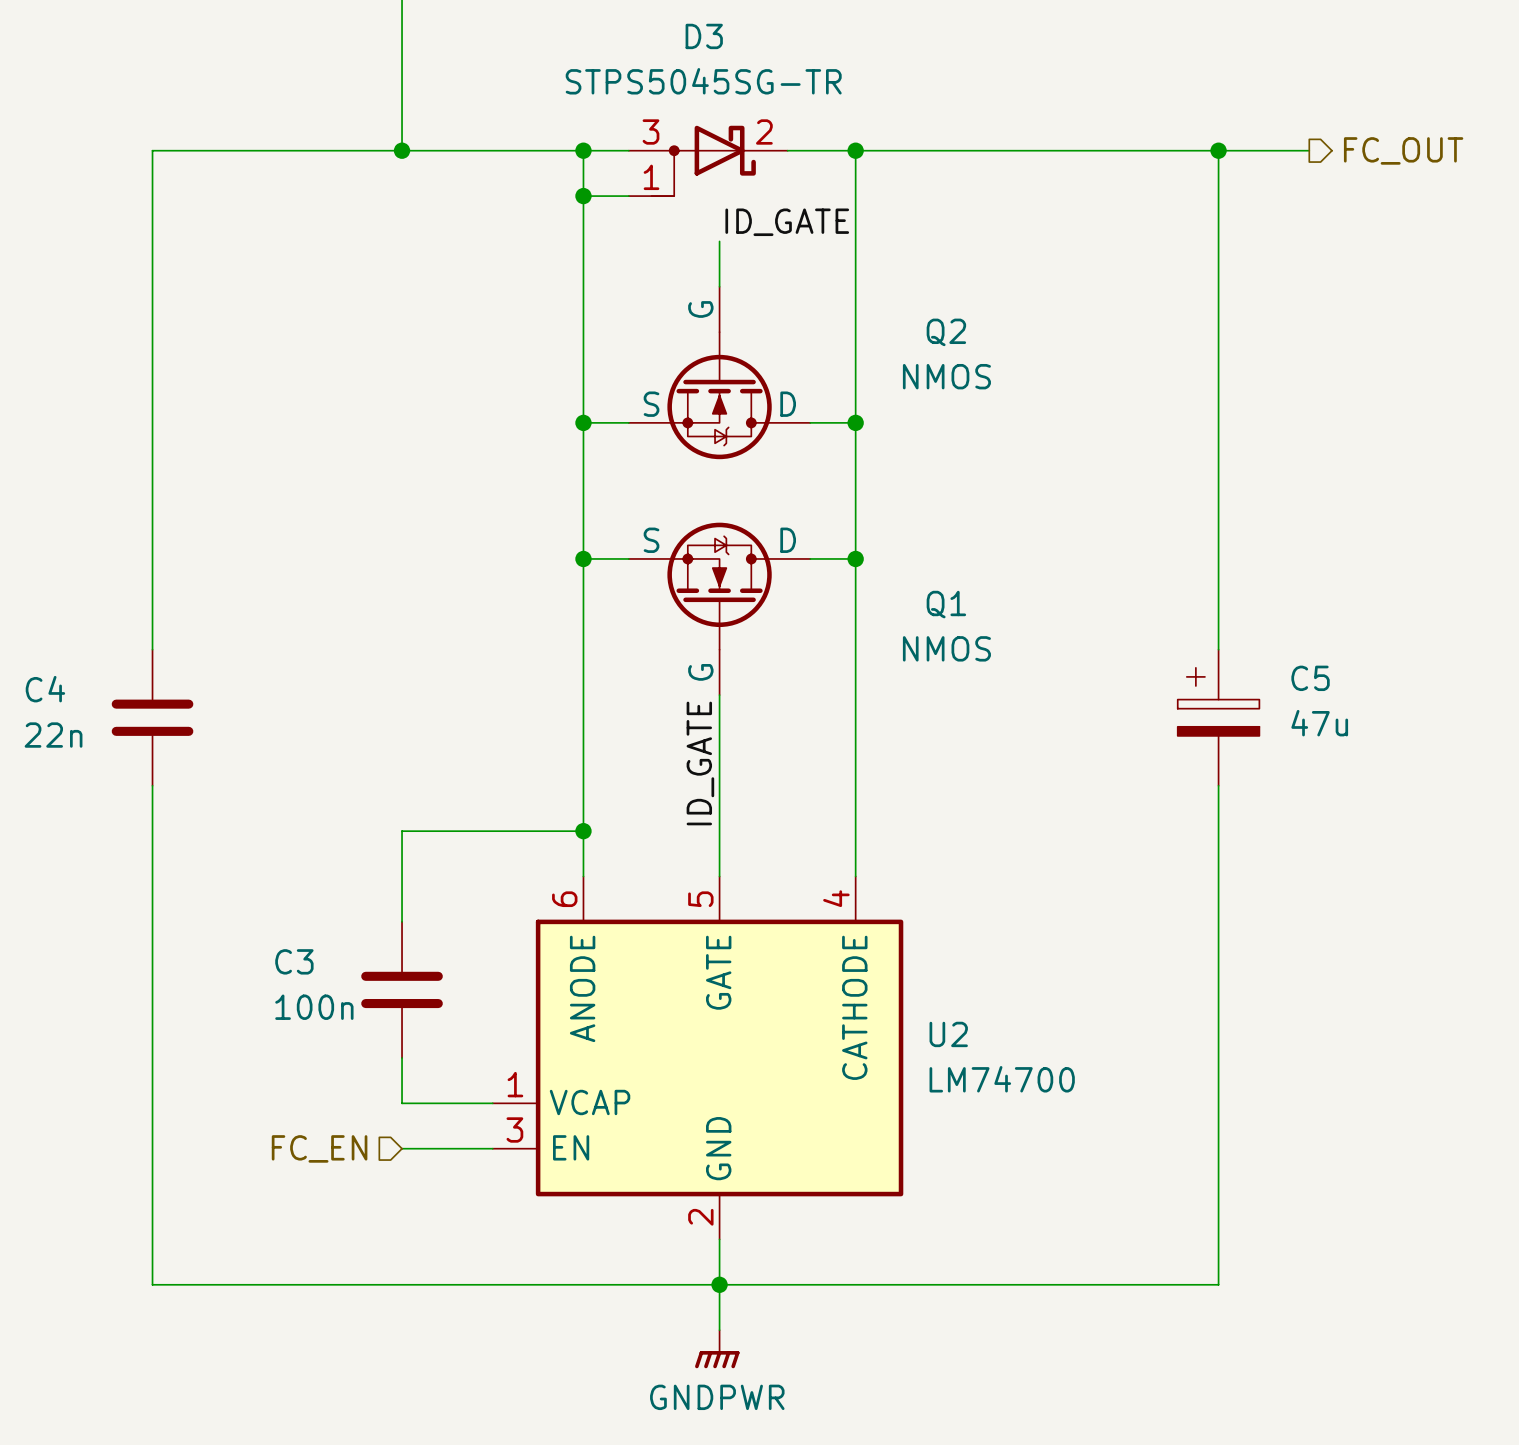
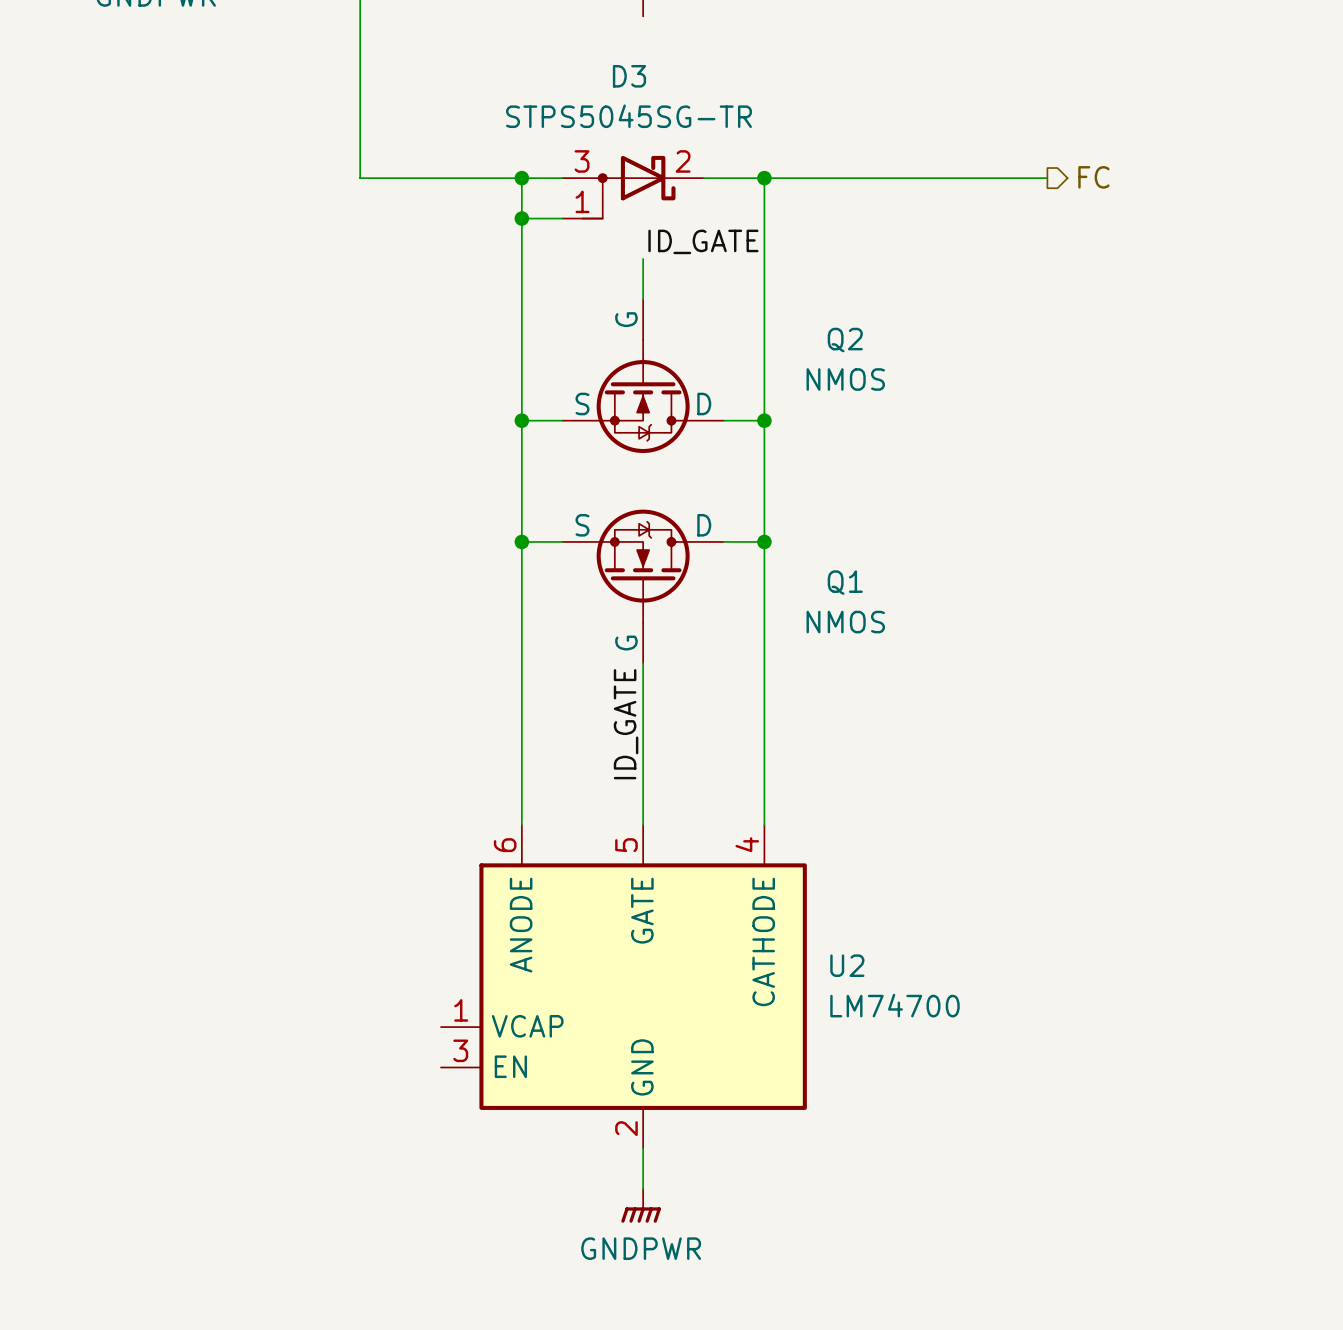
hierarchical label: none -> FC (1093, 177)
wire: (402, 150) (152, 150) (152, 649) -> none
junction: (402, 150) -> none
wire: (1173, 150) (1309, 150) -> none
wire: (1218, 150) (1218, 649) -> none
junction: (1218, 150) -> none
hierarchical label: FC_OUT (1403, 150) -> none
C4: 22n (152, 717) -> none
C5: 47u (1218, 717) -> none
wire: (152, 785) (152, 1284) (1218, 1284) (1218, 785) -> none
wire: (583, 831) (402, 831) (402, 921) -> none
junction: (583, 831) -> none
C3: 100n (402, 989) -> none
wire: (402, 1057) (402, 1103) (492, 1103) -> none
hierarchical label: FC_EN (319, 1148) -> none
wire: (402, 1148) (492, 1148) -> none
junction: (719, 1284) -> none
power symbol position: GNDPWR (717, 1349) -> GNDPWR (641, 1205)

